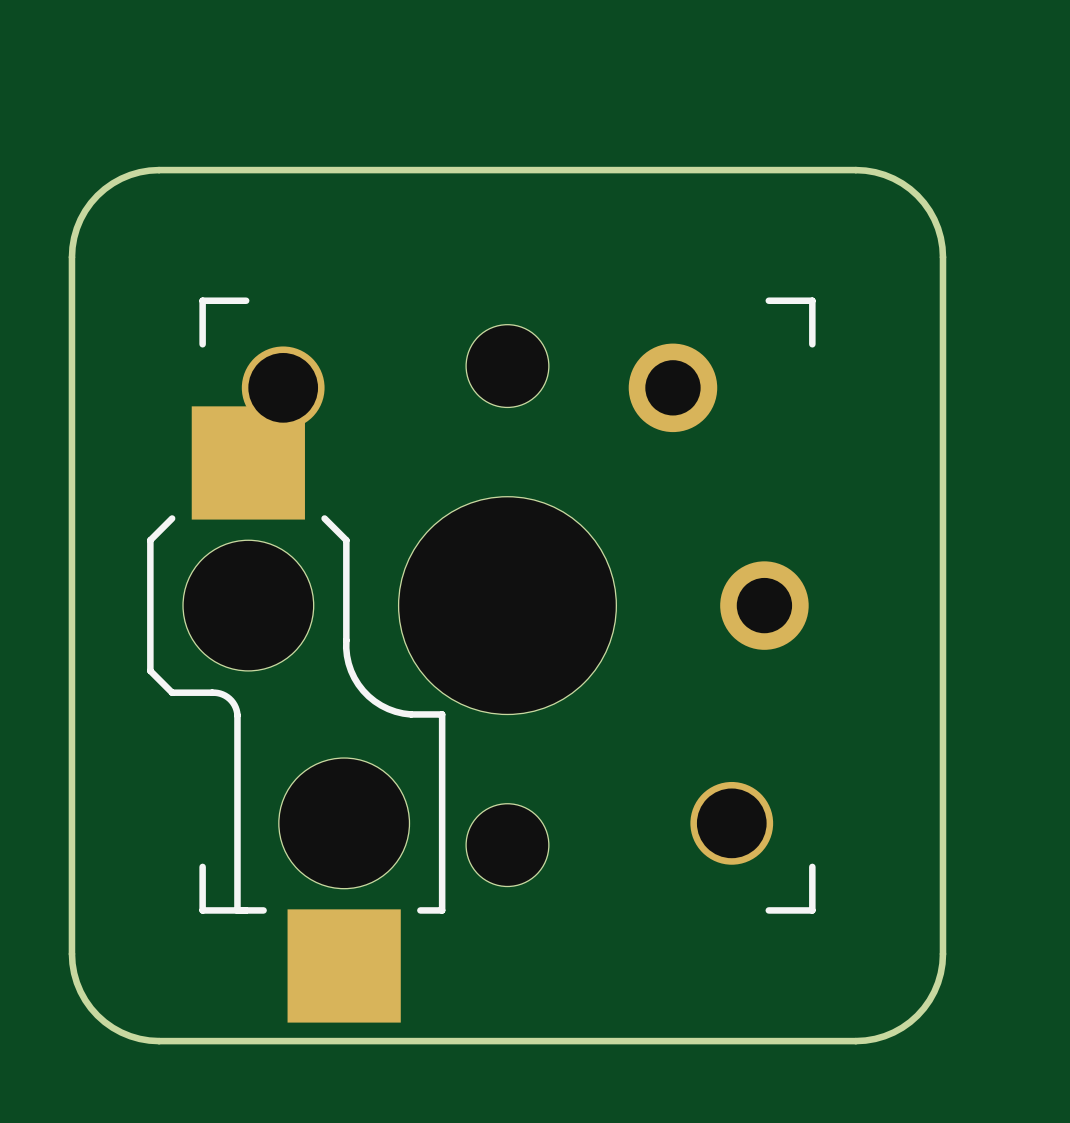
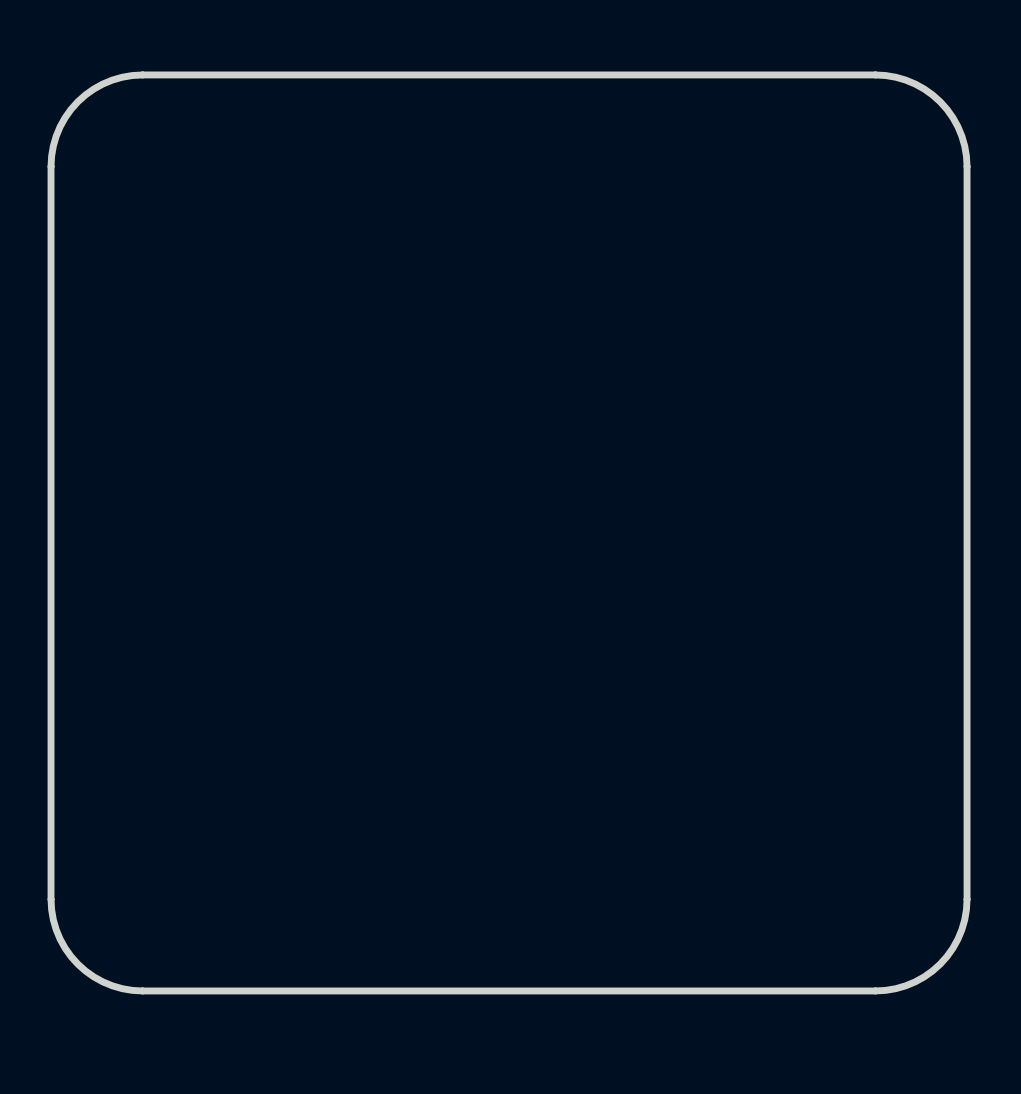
part: (481, 660) -> none

